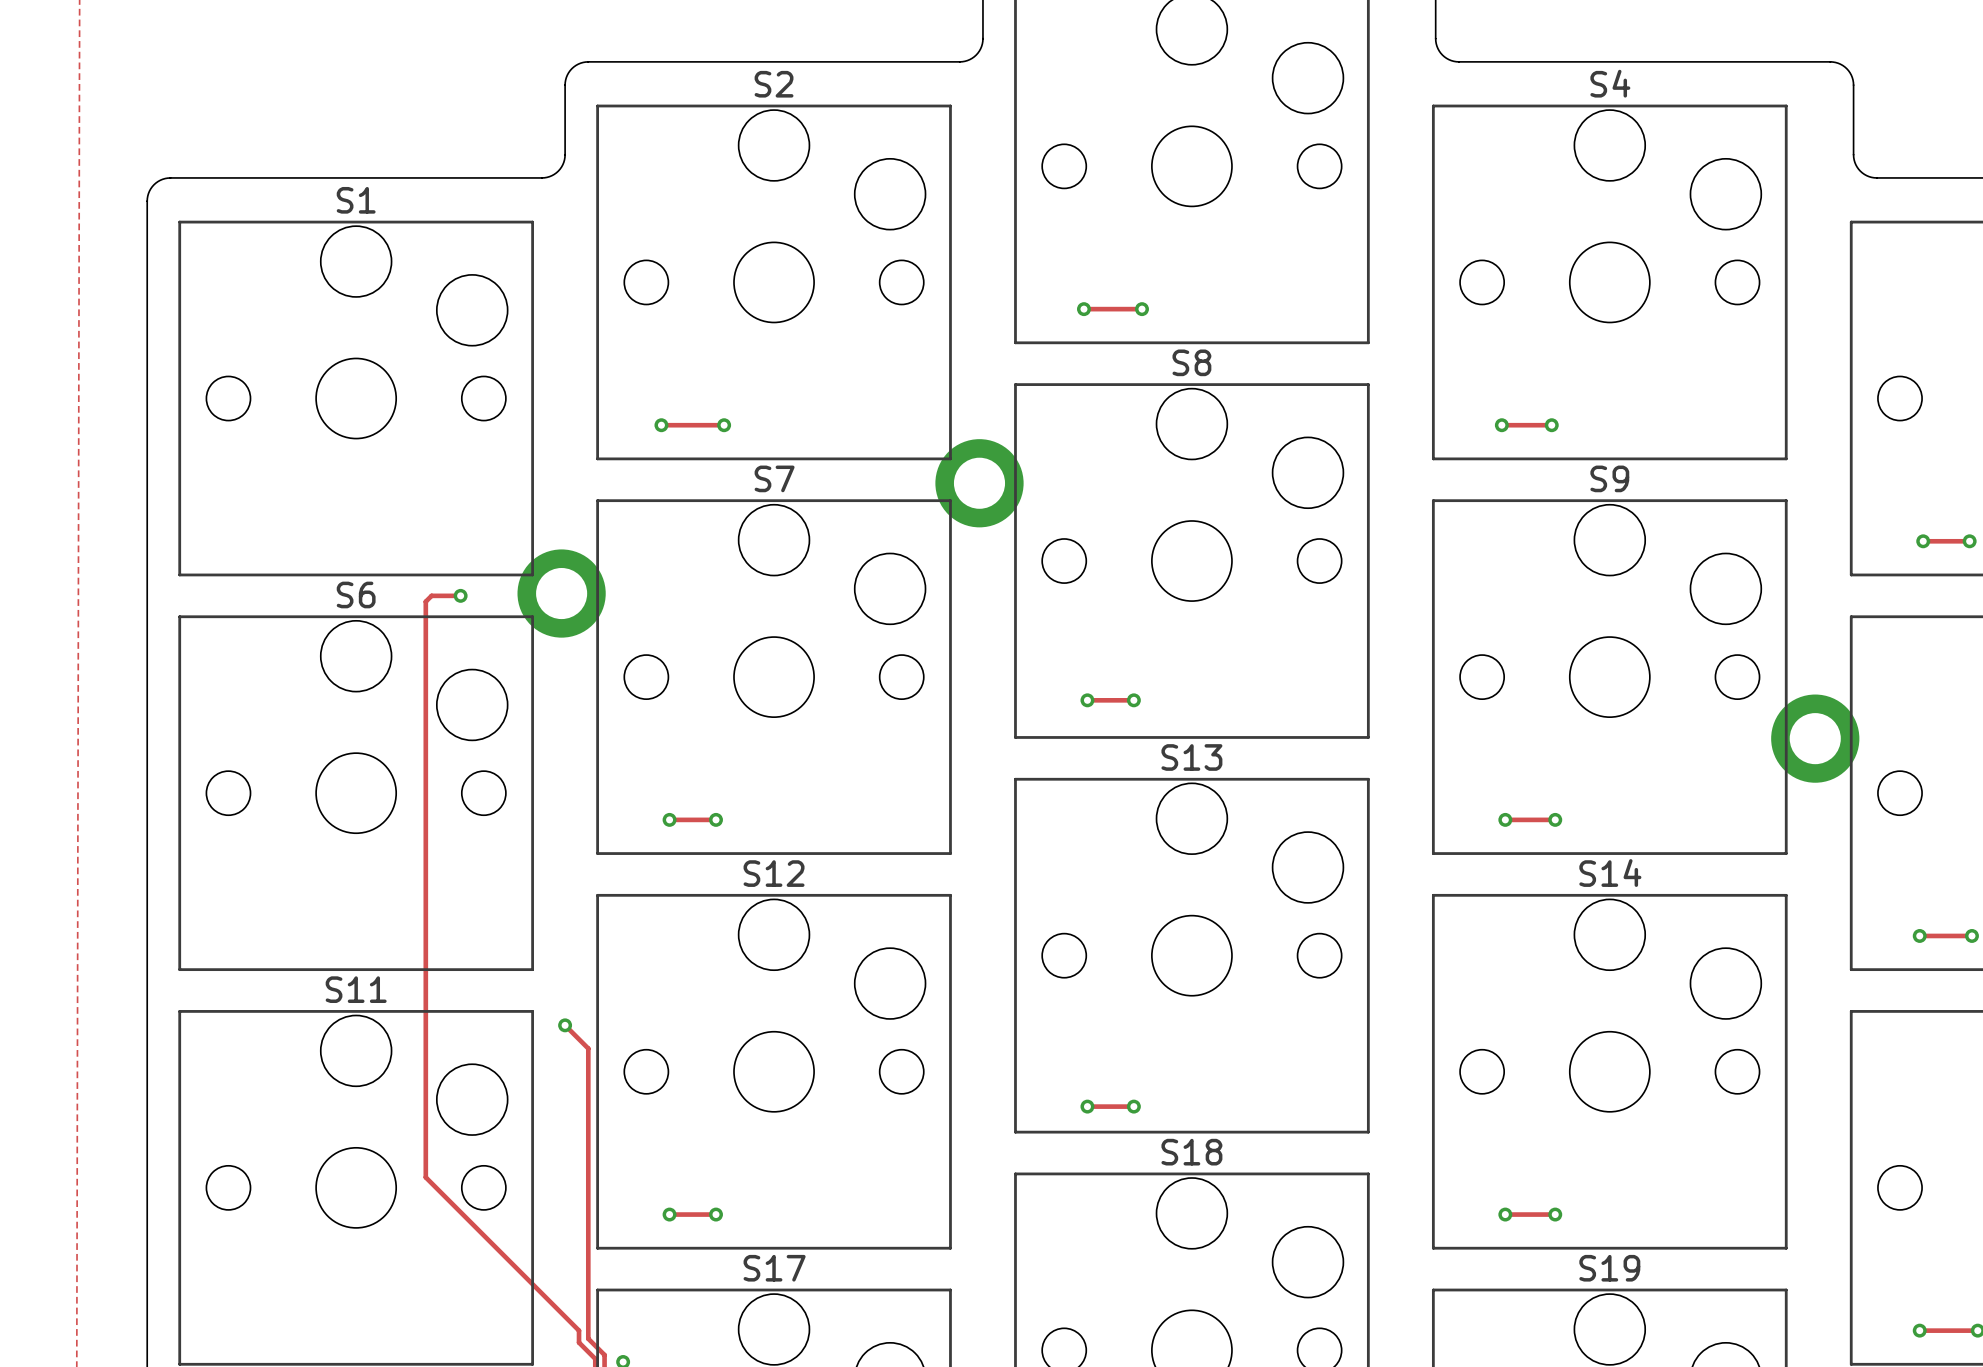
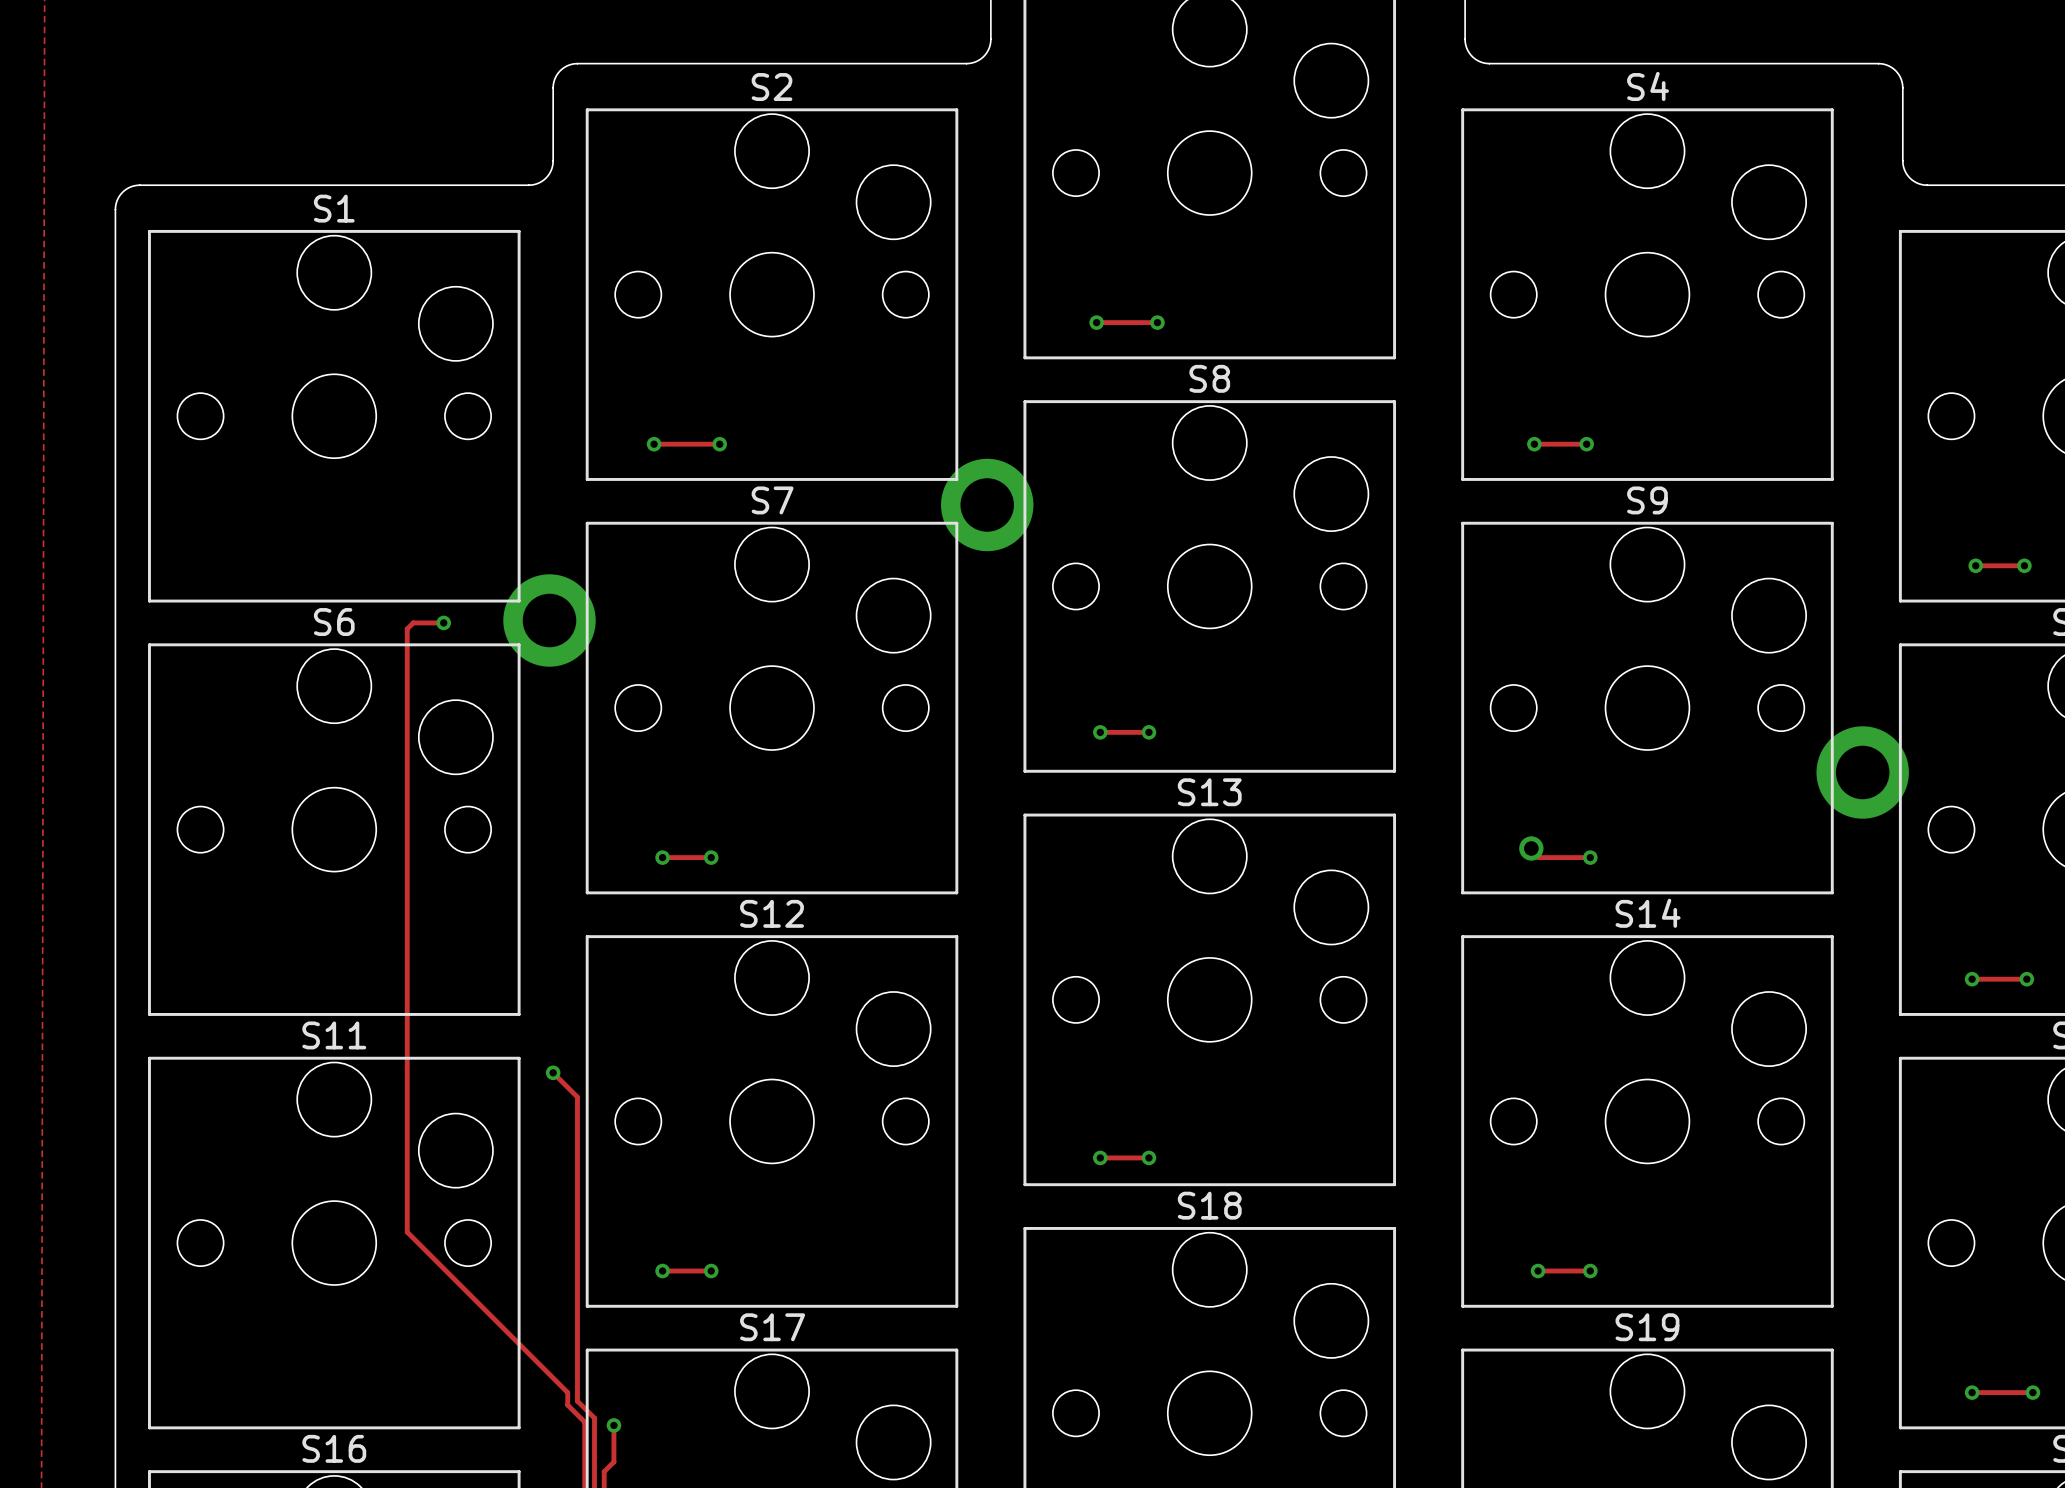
via size: [1498, 812, 1513, 827] -> [1519, 836, 1544, 861]

